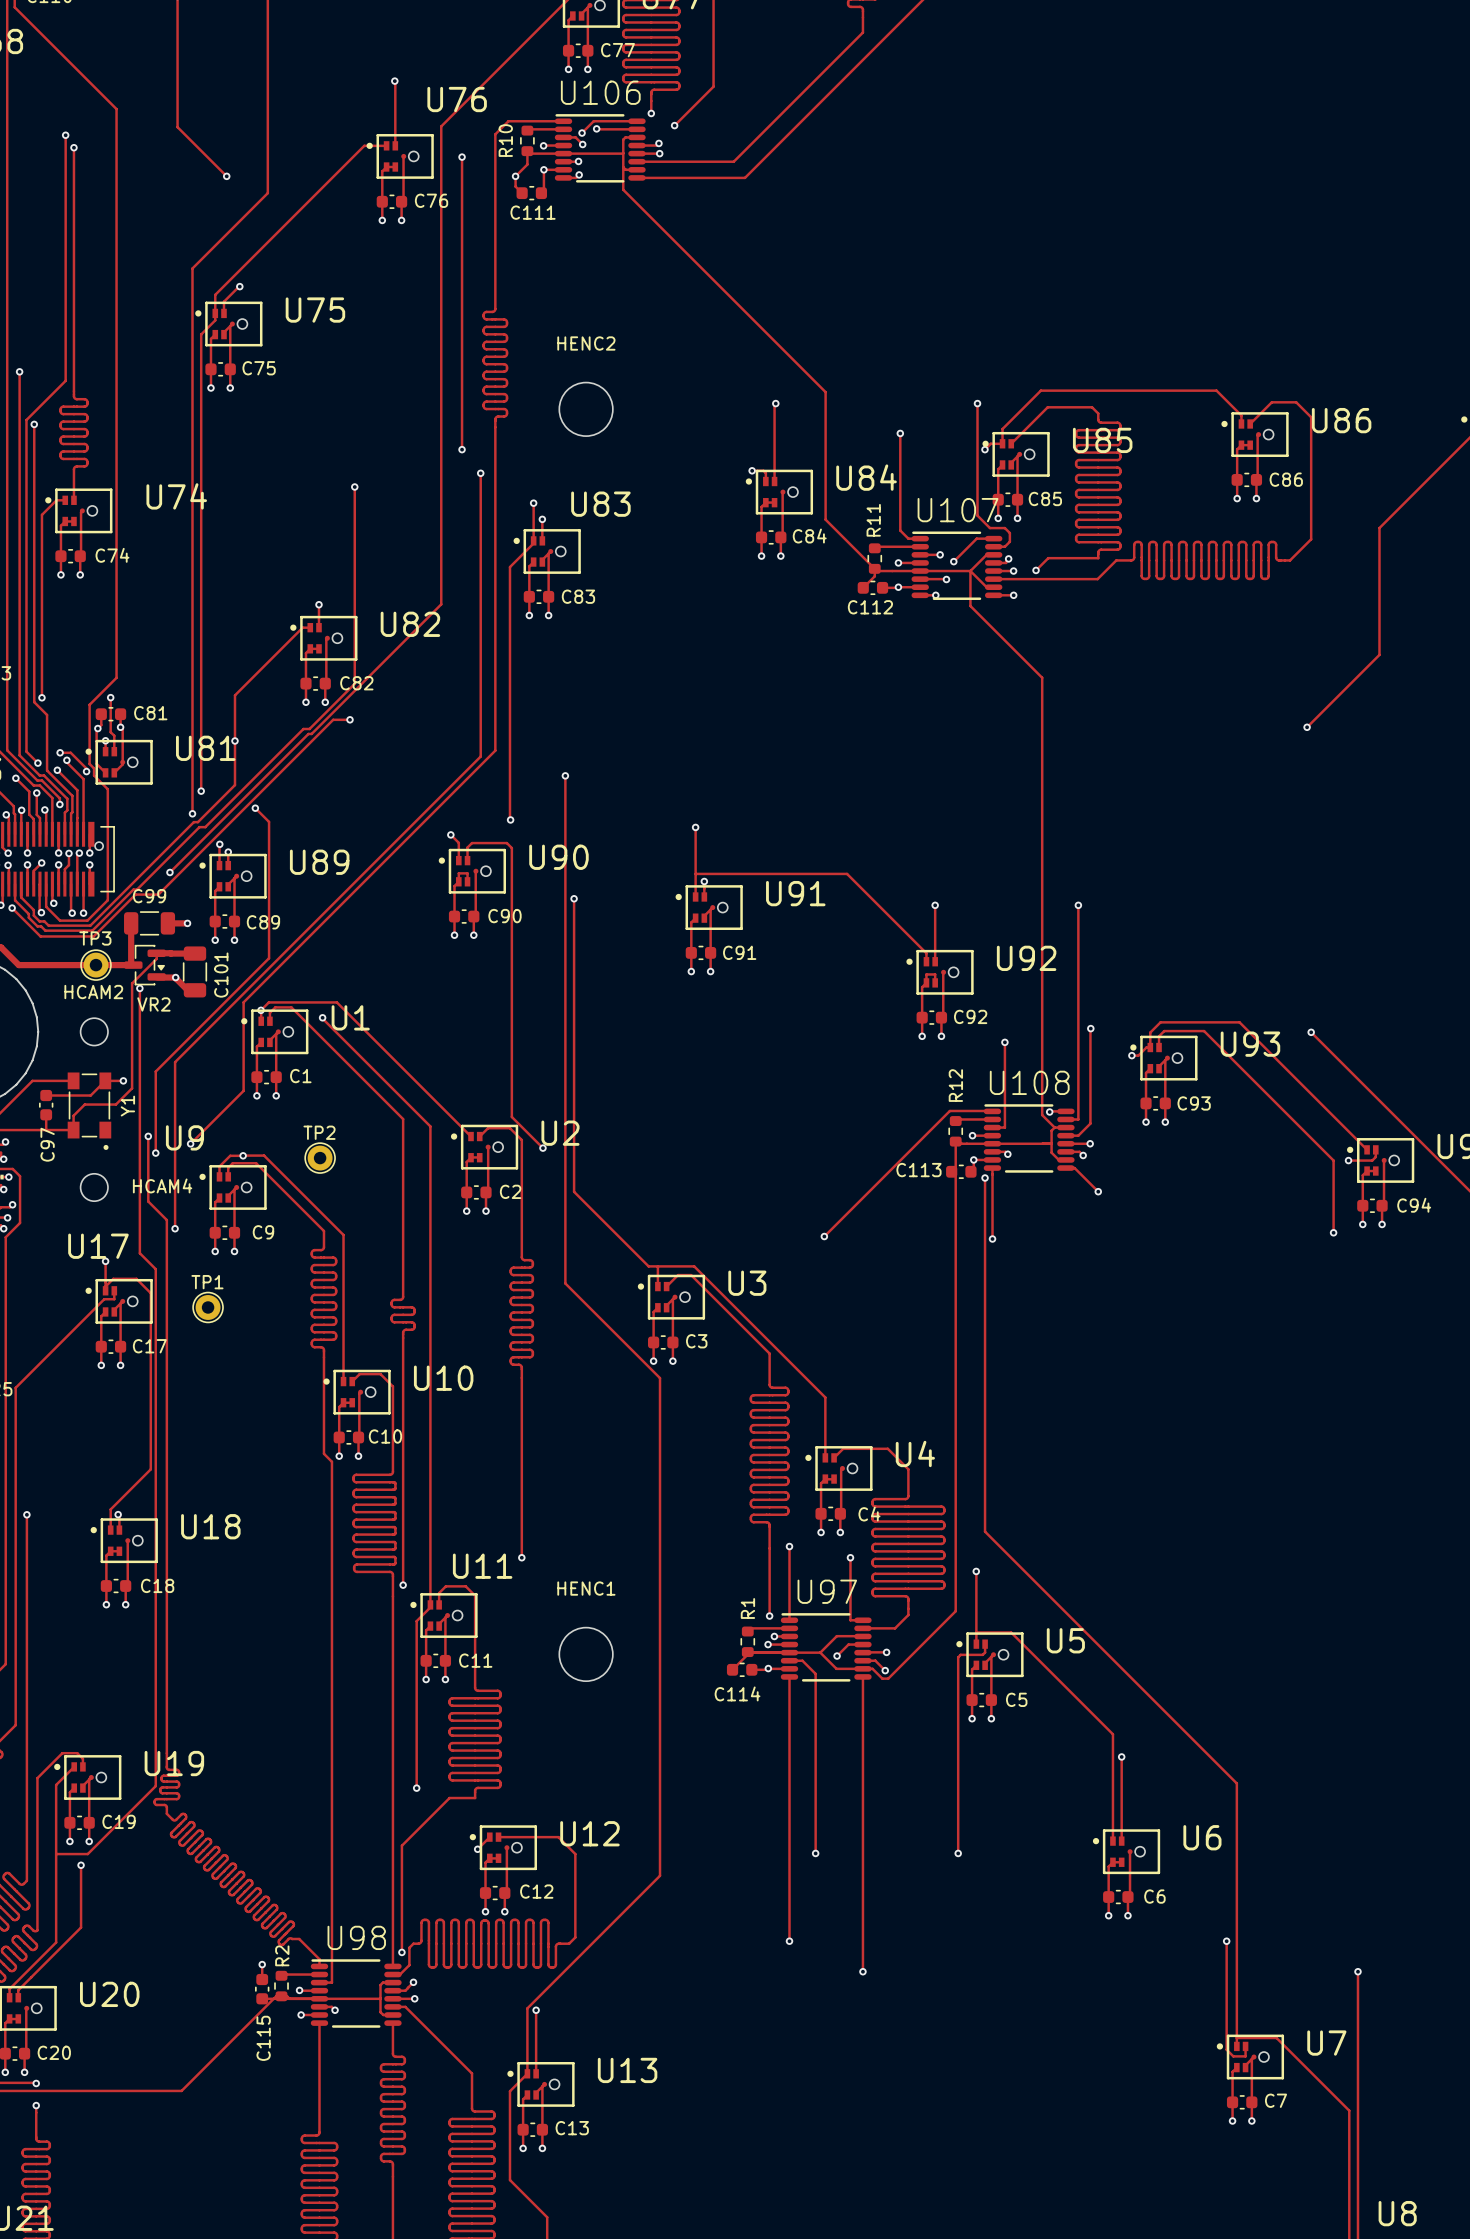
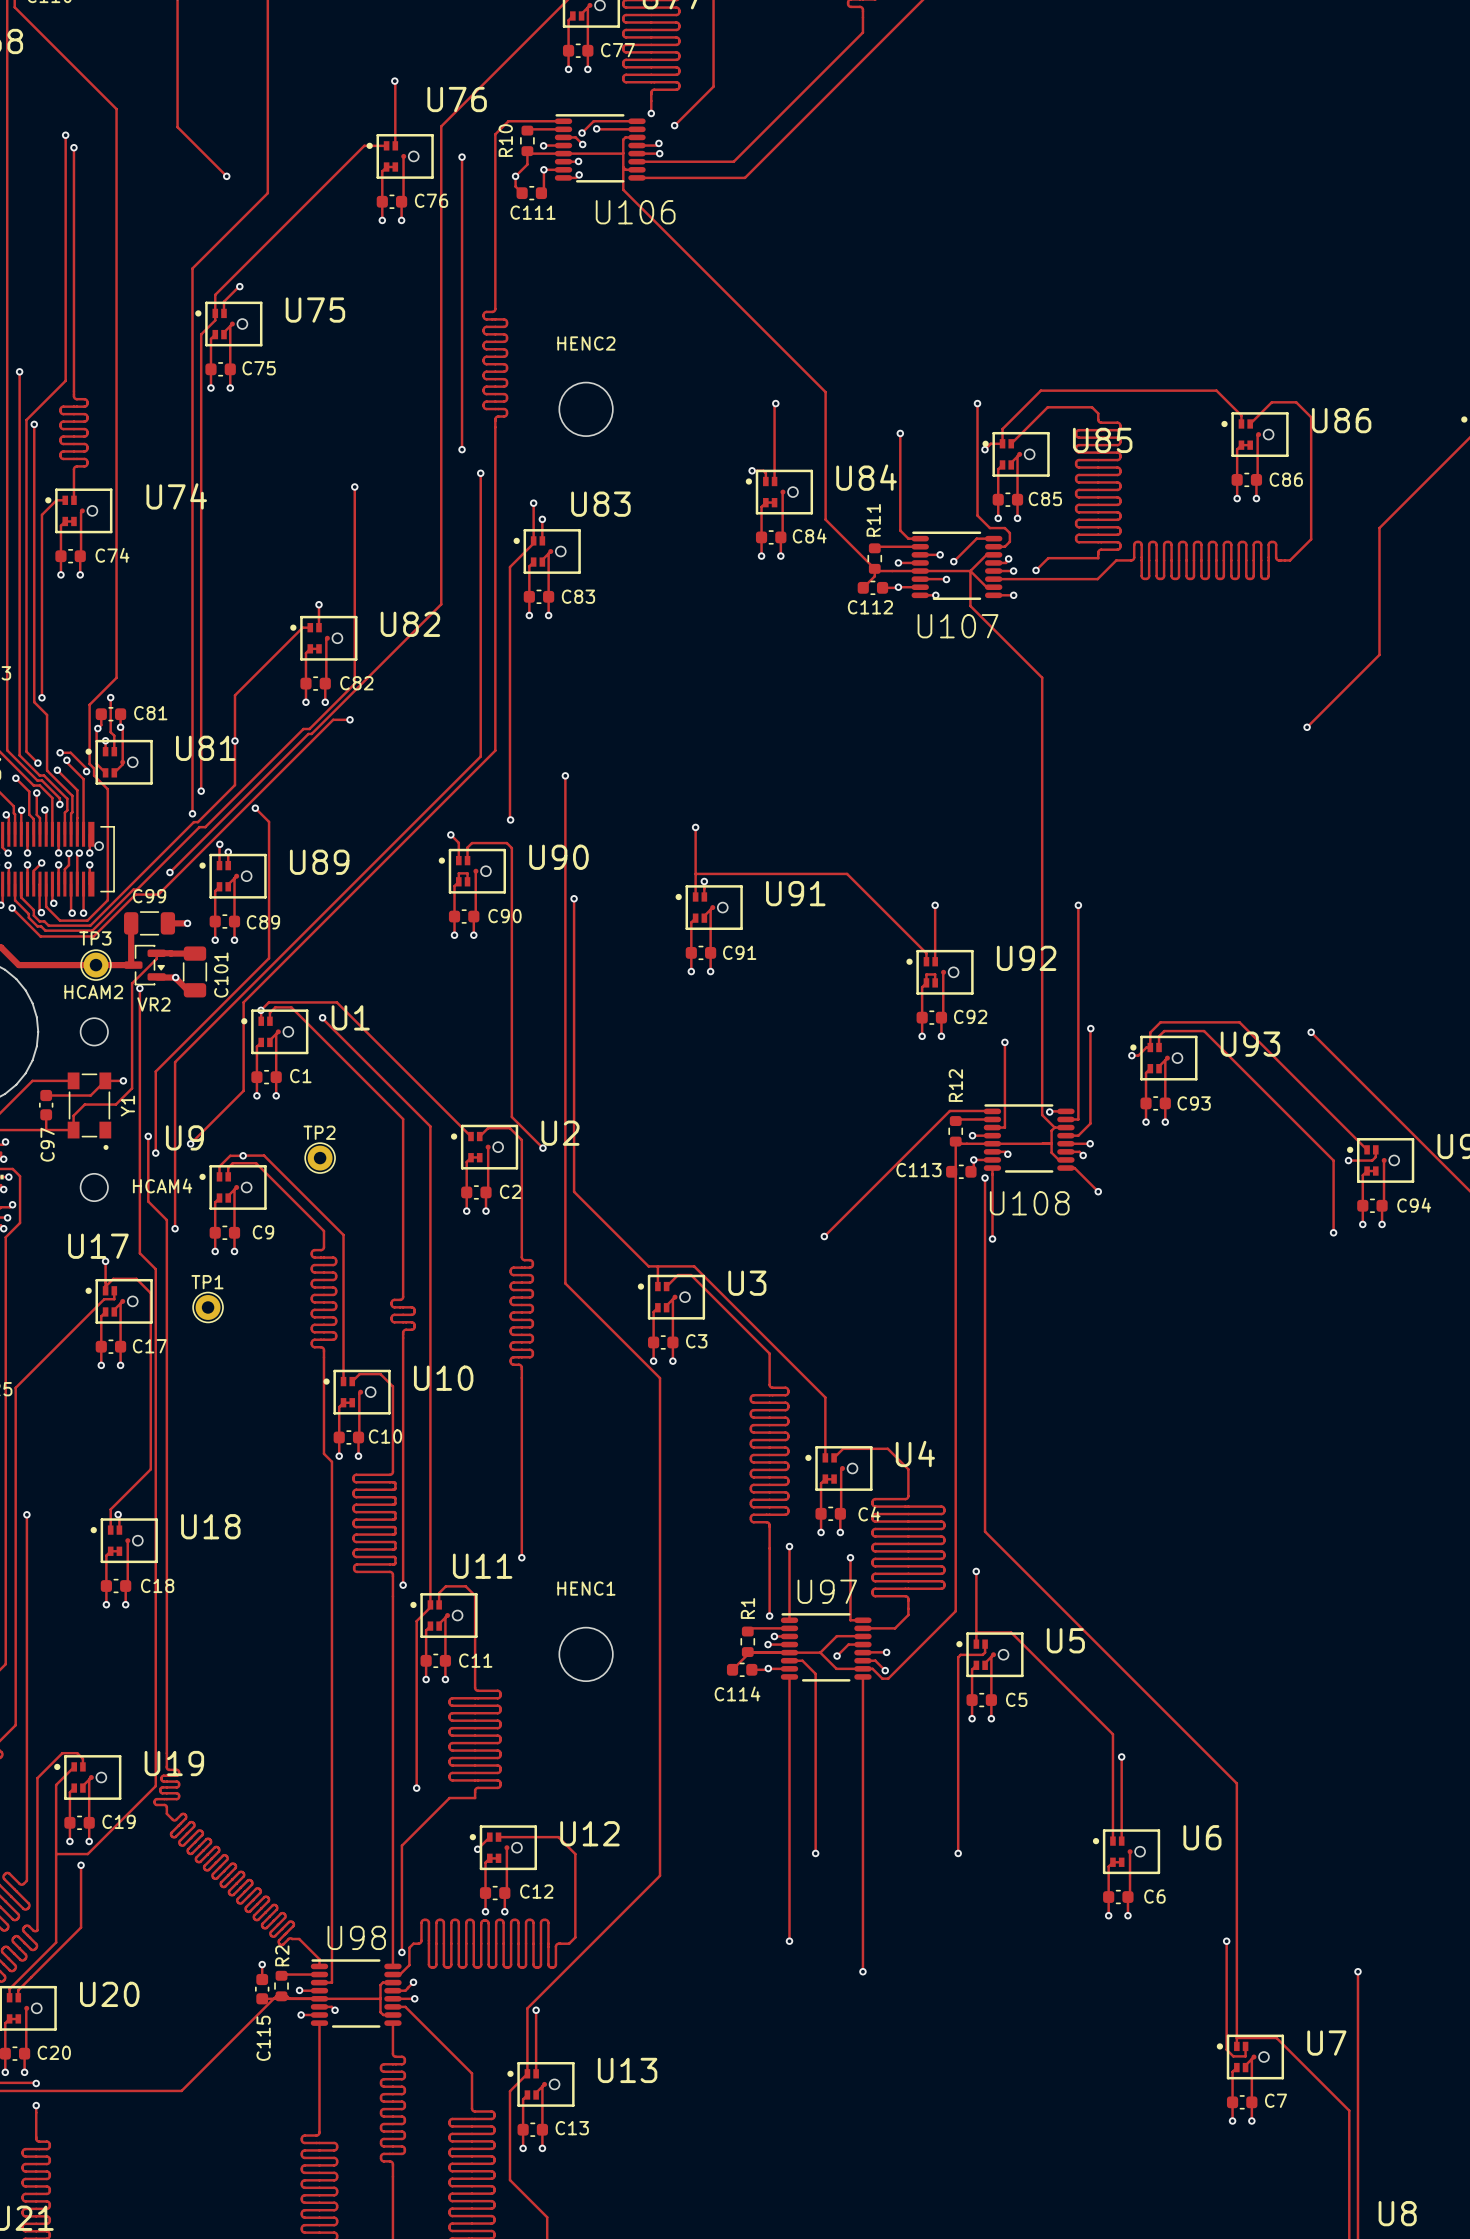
U106 name position: U106 (600, 92) -> U106 (635, 212)
U107 name position: U107 (958, 510) -> U107 (958, 626)
U108 name position: U108 (1029, 1082) -> U108 (1029, 1203)

